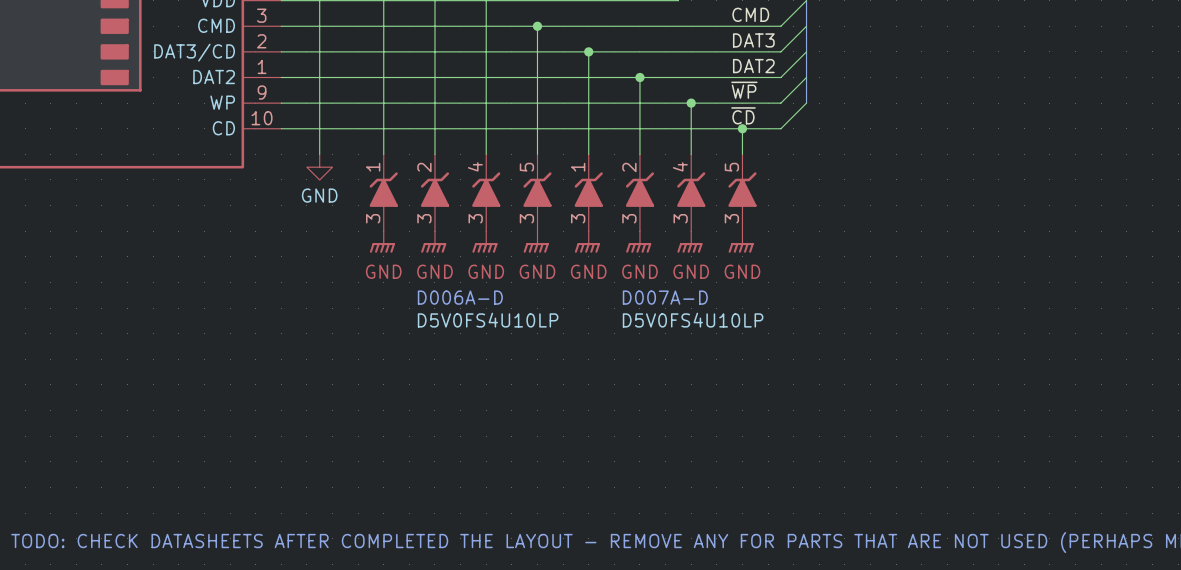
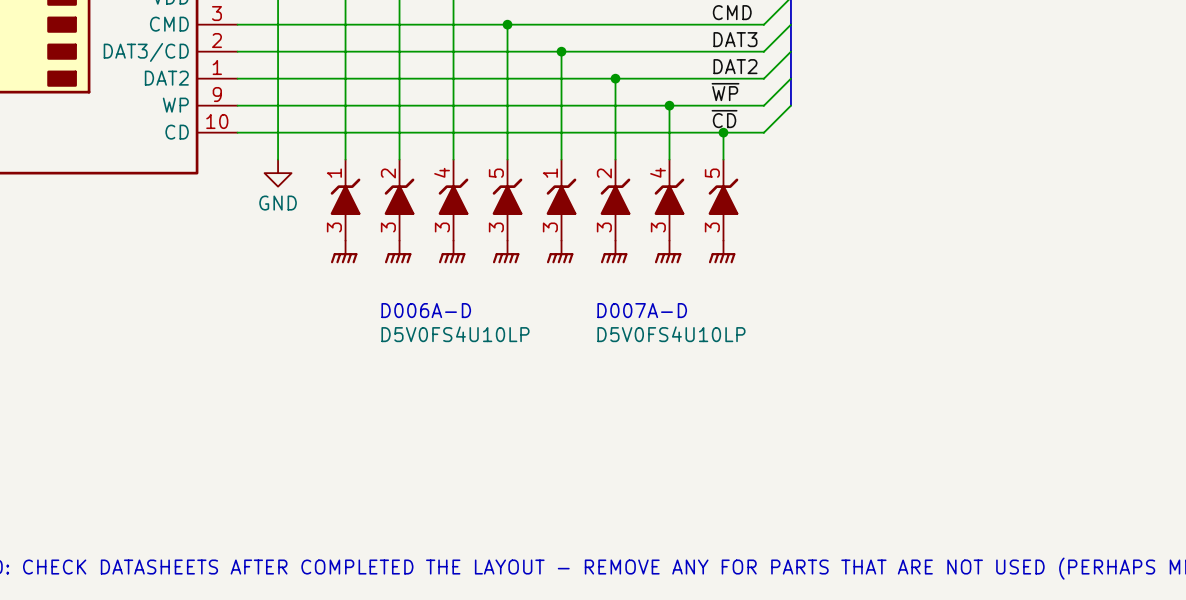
power symbol text: GND (383, 271) -> none
power symbol text: GND (434, 271) -> none
power symbol text: GND (486, 271) -> none
power symbol text: GND (537, 271) -> none
power symbol text: GND (588, 271) -> none
power symbol text: GND (639, 271) -> none
power symbol text: GND (691, 271) -> none
power symbol text: GND (742, 271) -> none

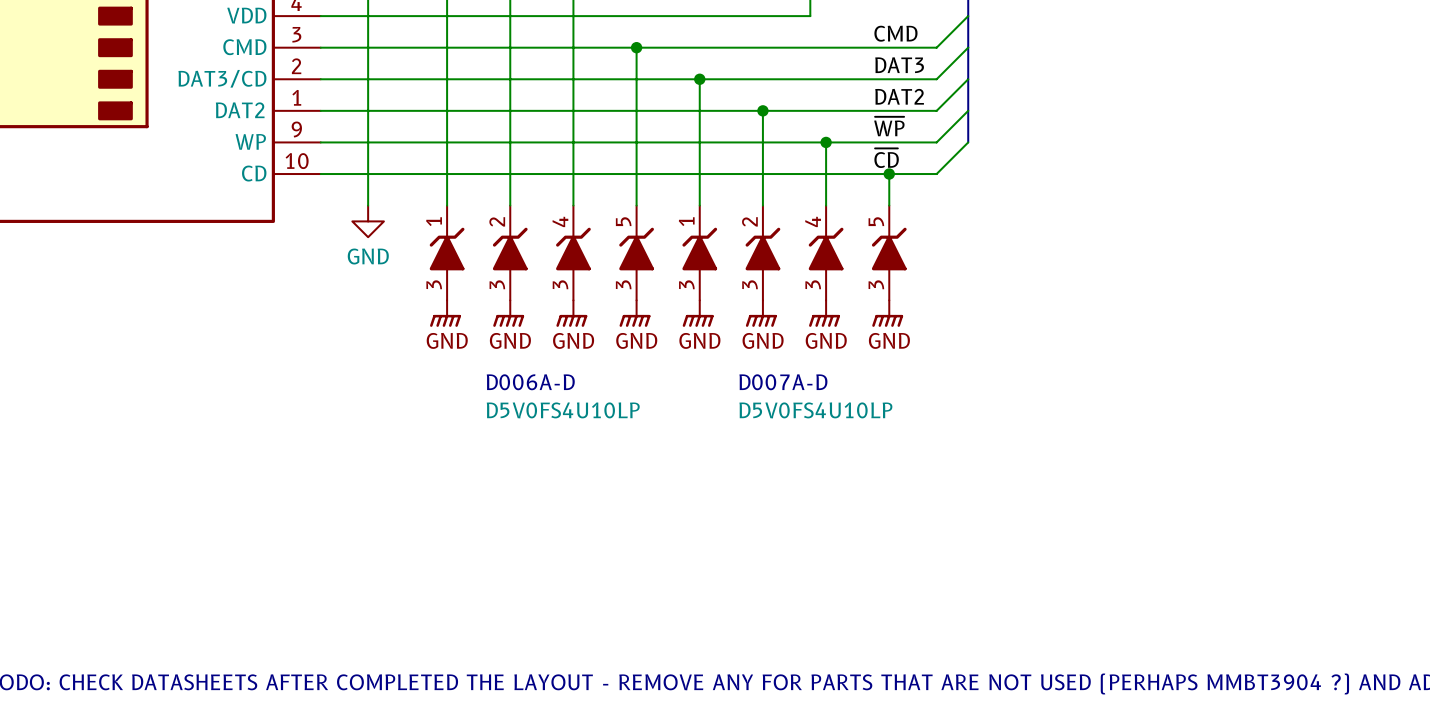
power symbol text: none -> GND (447, 340)
power symbol text: none -> GND (510, 340)
power symbol text: none -> GND (573, 340)
power symbol text: none -> GND (636, 340)
power symbol text: none -> GND (699, 340)
power symbol text: none -> GND (763, 340)
power symbol text: none -> GND (826, 340)
power symbol text: none -> GND (889, 340)

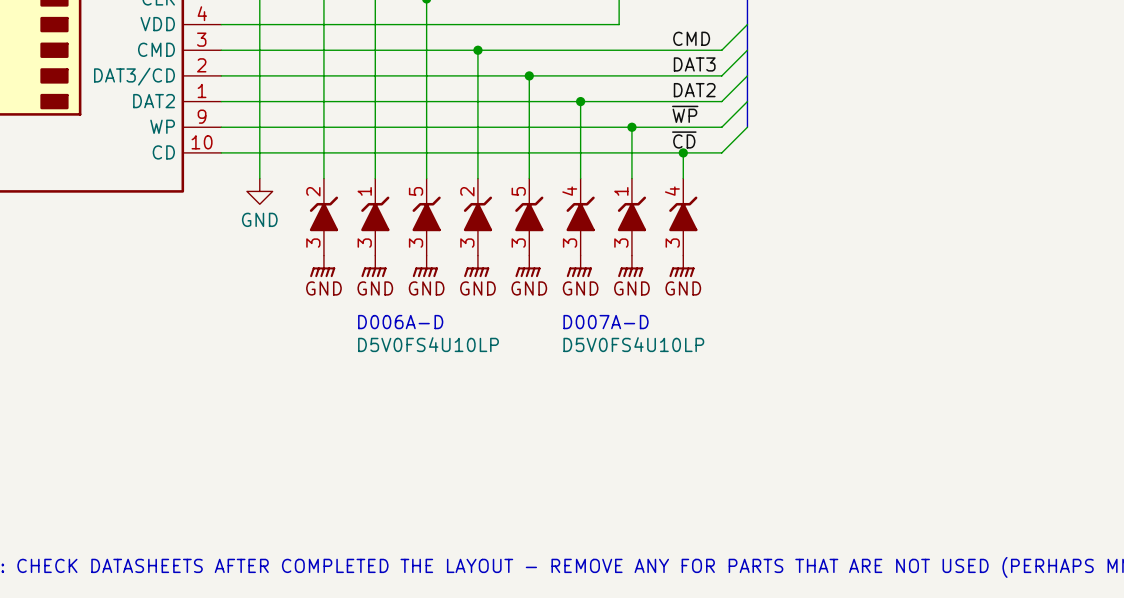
part pin number: 1 (434, 221) -> 2 (313, 191)
part pin number: 2 (497, 221) -> 1 (364, 191)
part pin number: 4 (560, 221) -> 5 (416, 191)
part pin number: 5 (623, 221) -> 2 (467, 191)
part pin number: 1 (686, 221) -> 5 (518, 191)
part pin number: 2 (749, 221) -> 4 (569, 191)
part pin number: 4 (813, 221) -> 1 (621, 191)
part pin number: 5 (876, 221) -> 4 (672, 191)

